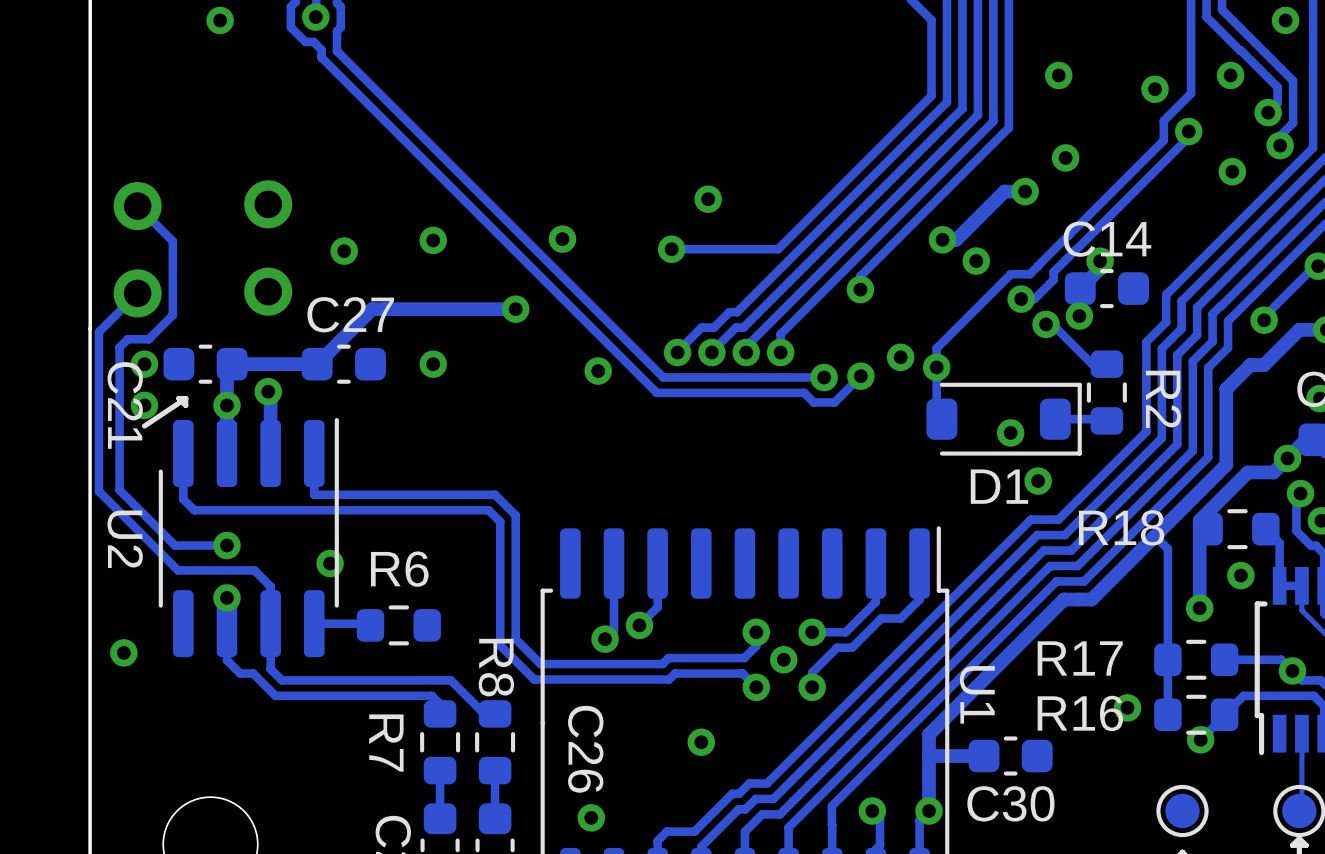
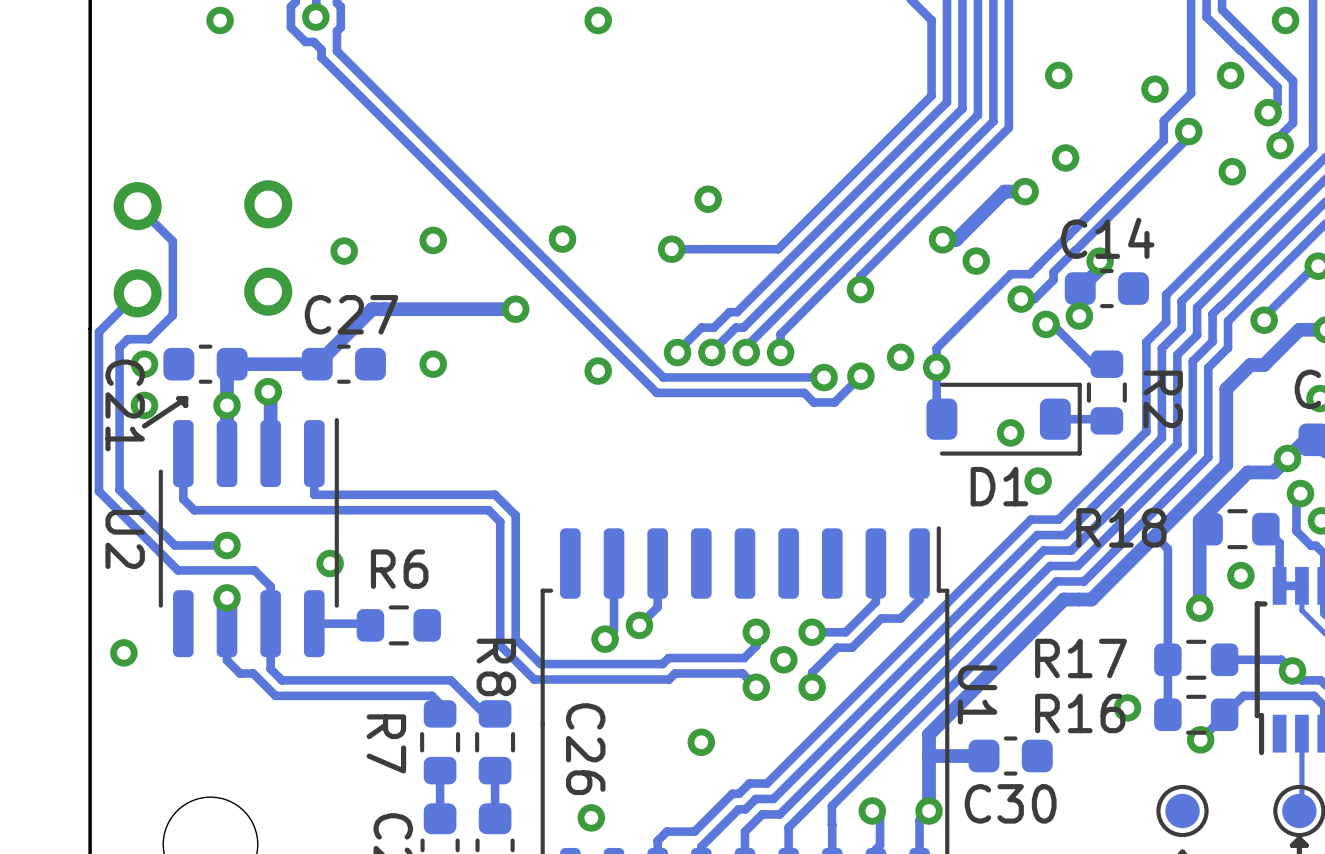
via: none -> (598, 20)

